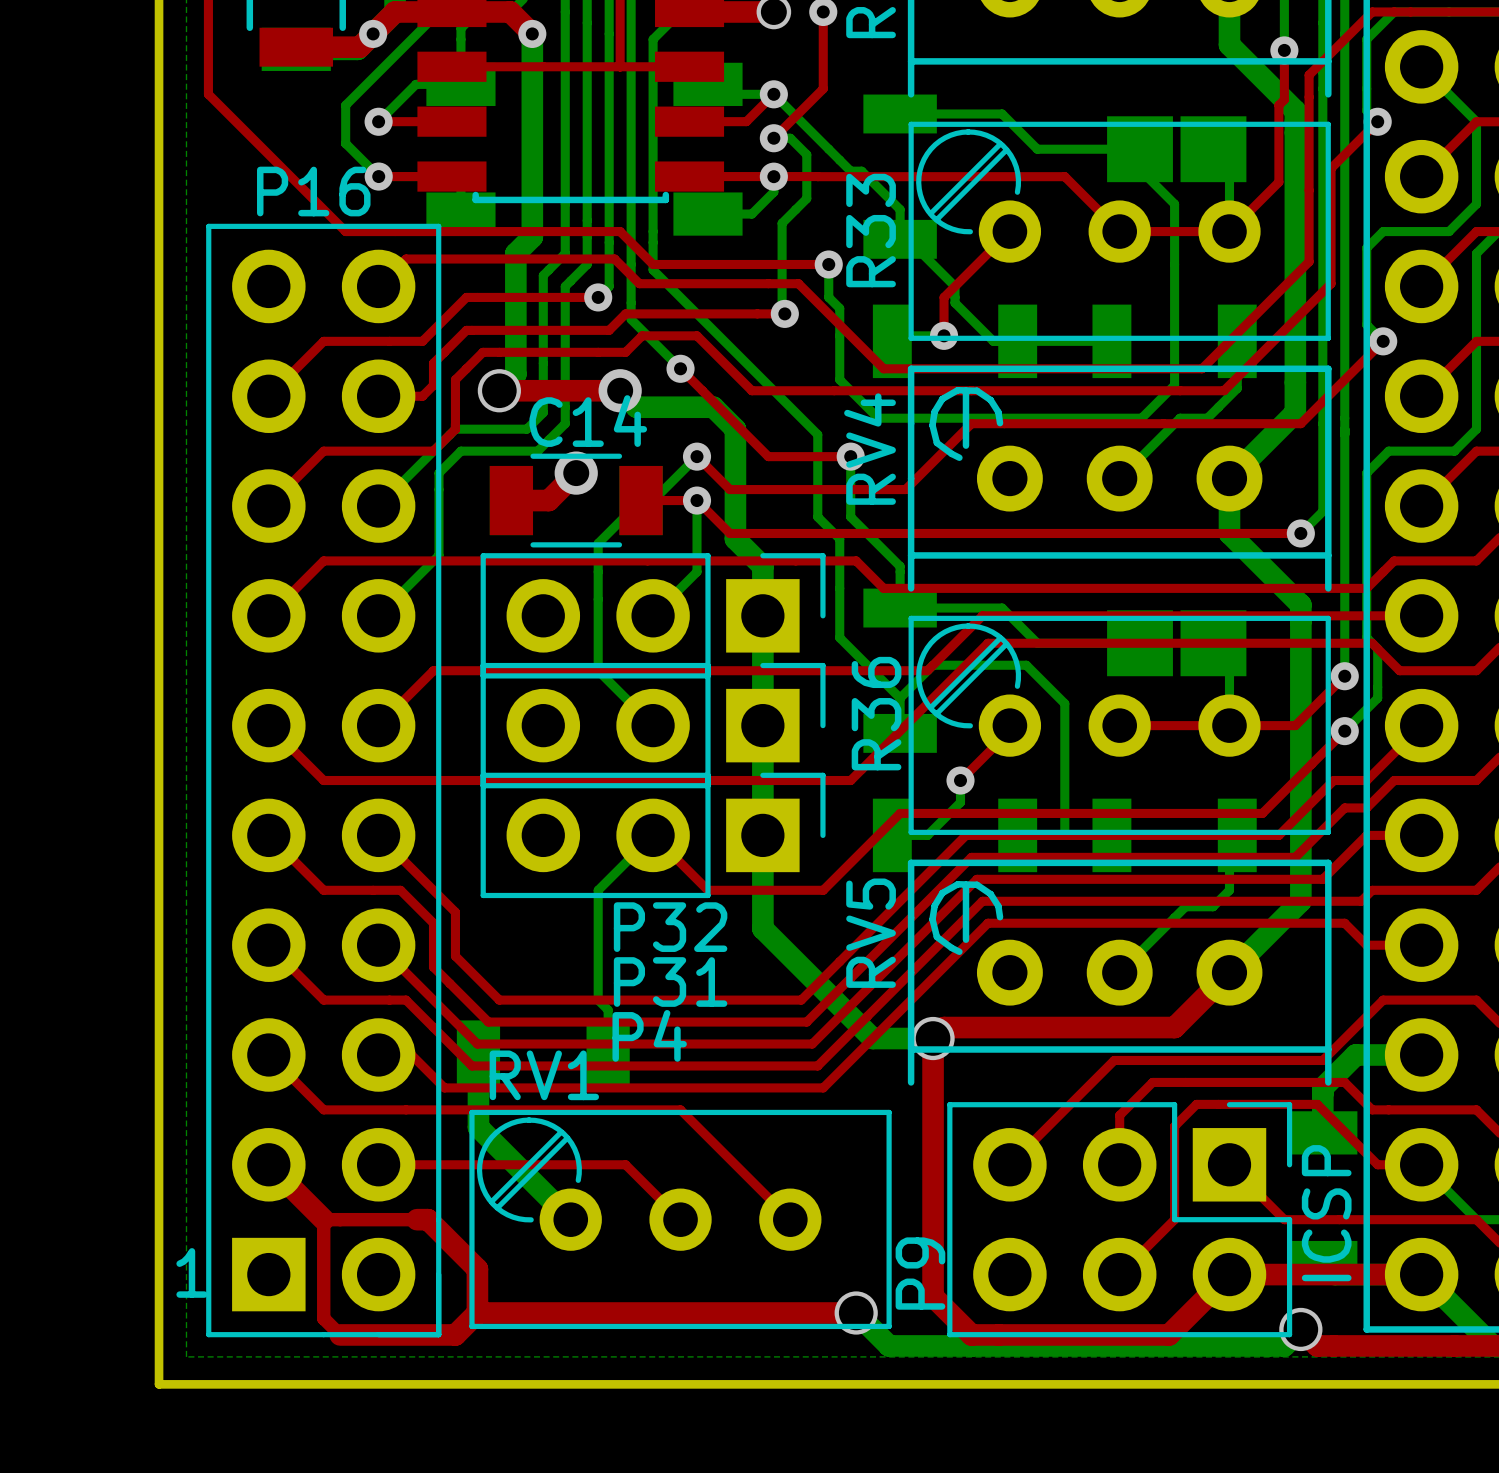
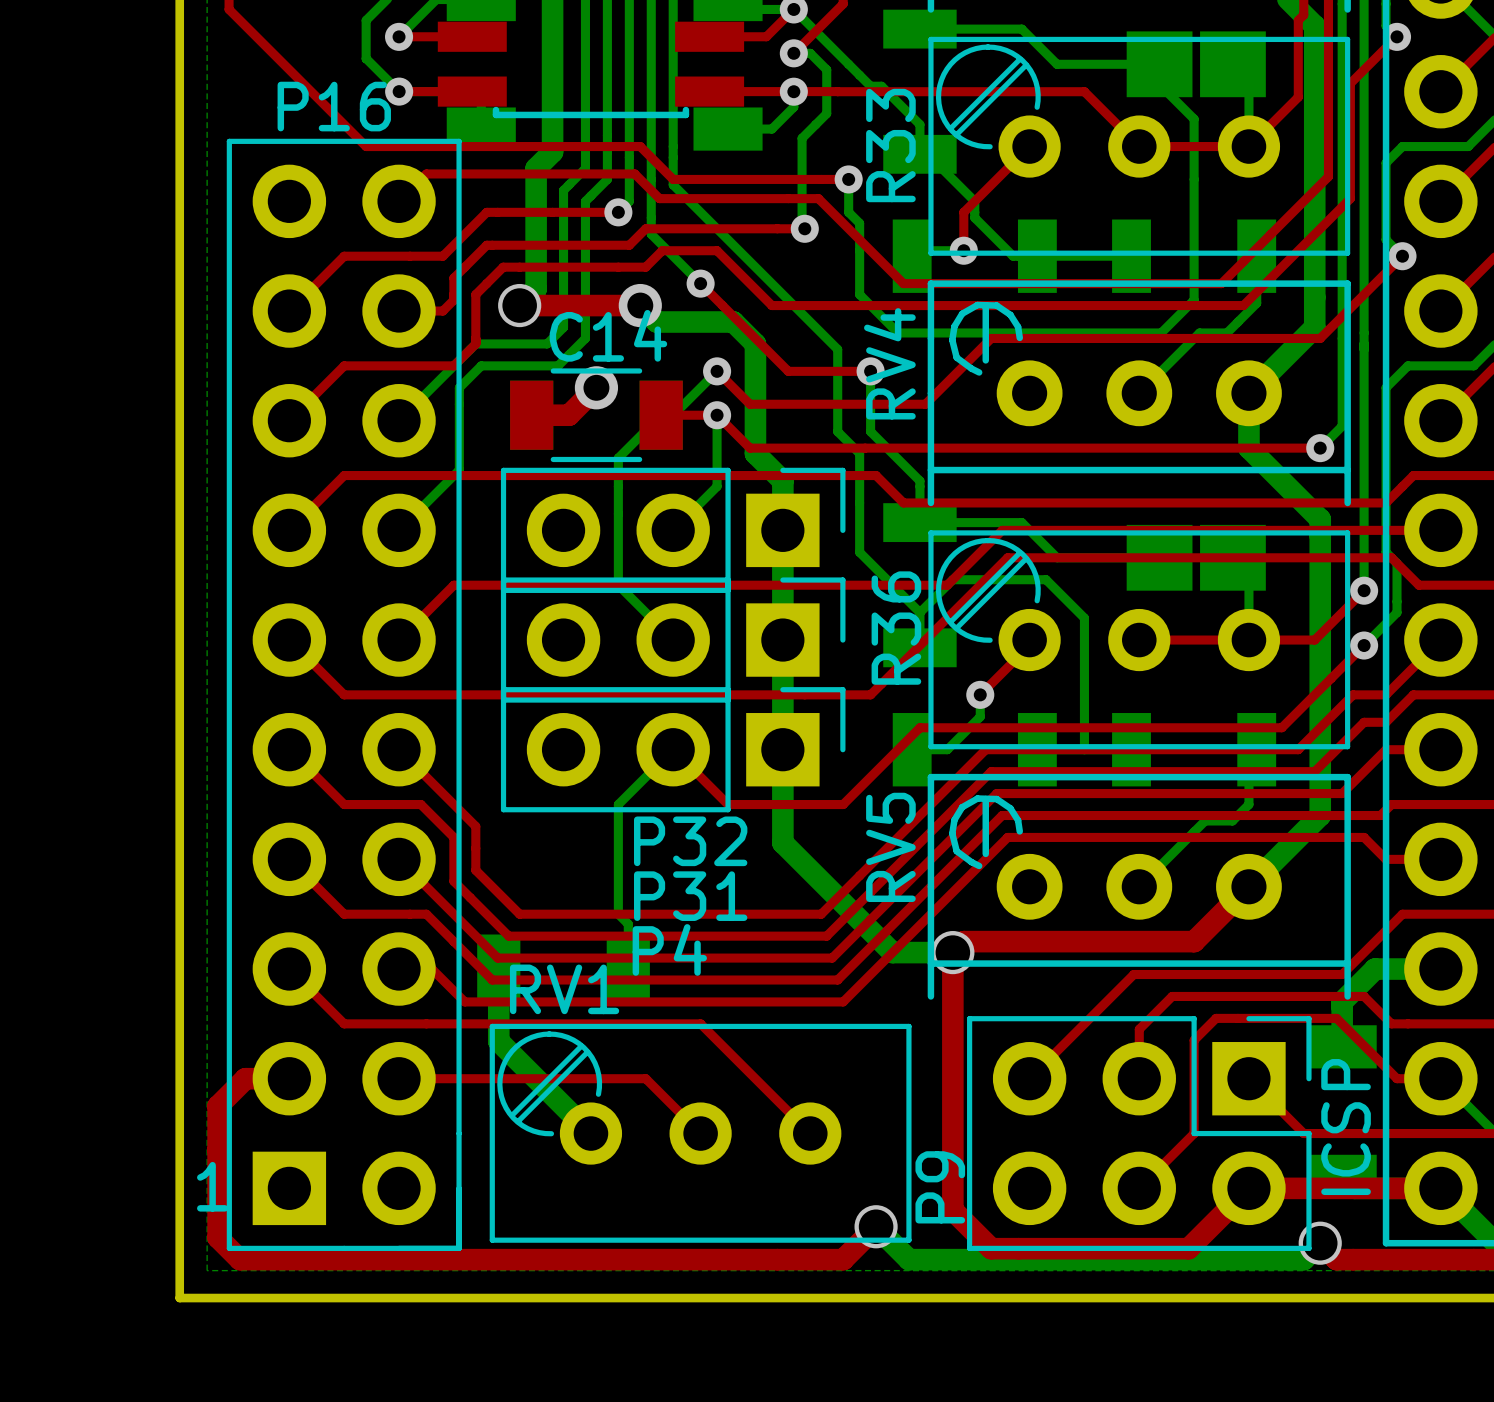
top track: (323, 1219) (268, 1164) (323, 1219) -> none
top track: (323, 1219) (323, 1318) (340, 1334) (455, 1334) (477, 1313) -> none
top track: (323, 1219) (428, 1219) (477, 1269) (477, 1313) -> none
top track: (477, 1313) (856, 1313) -> (289, 1078) (245, 1078) (218, 1106) (218, 1237) (240, 1259) (843, 1259) (876, 1226)

